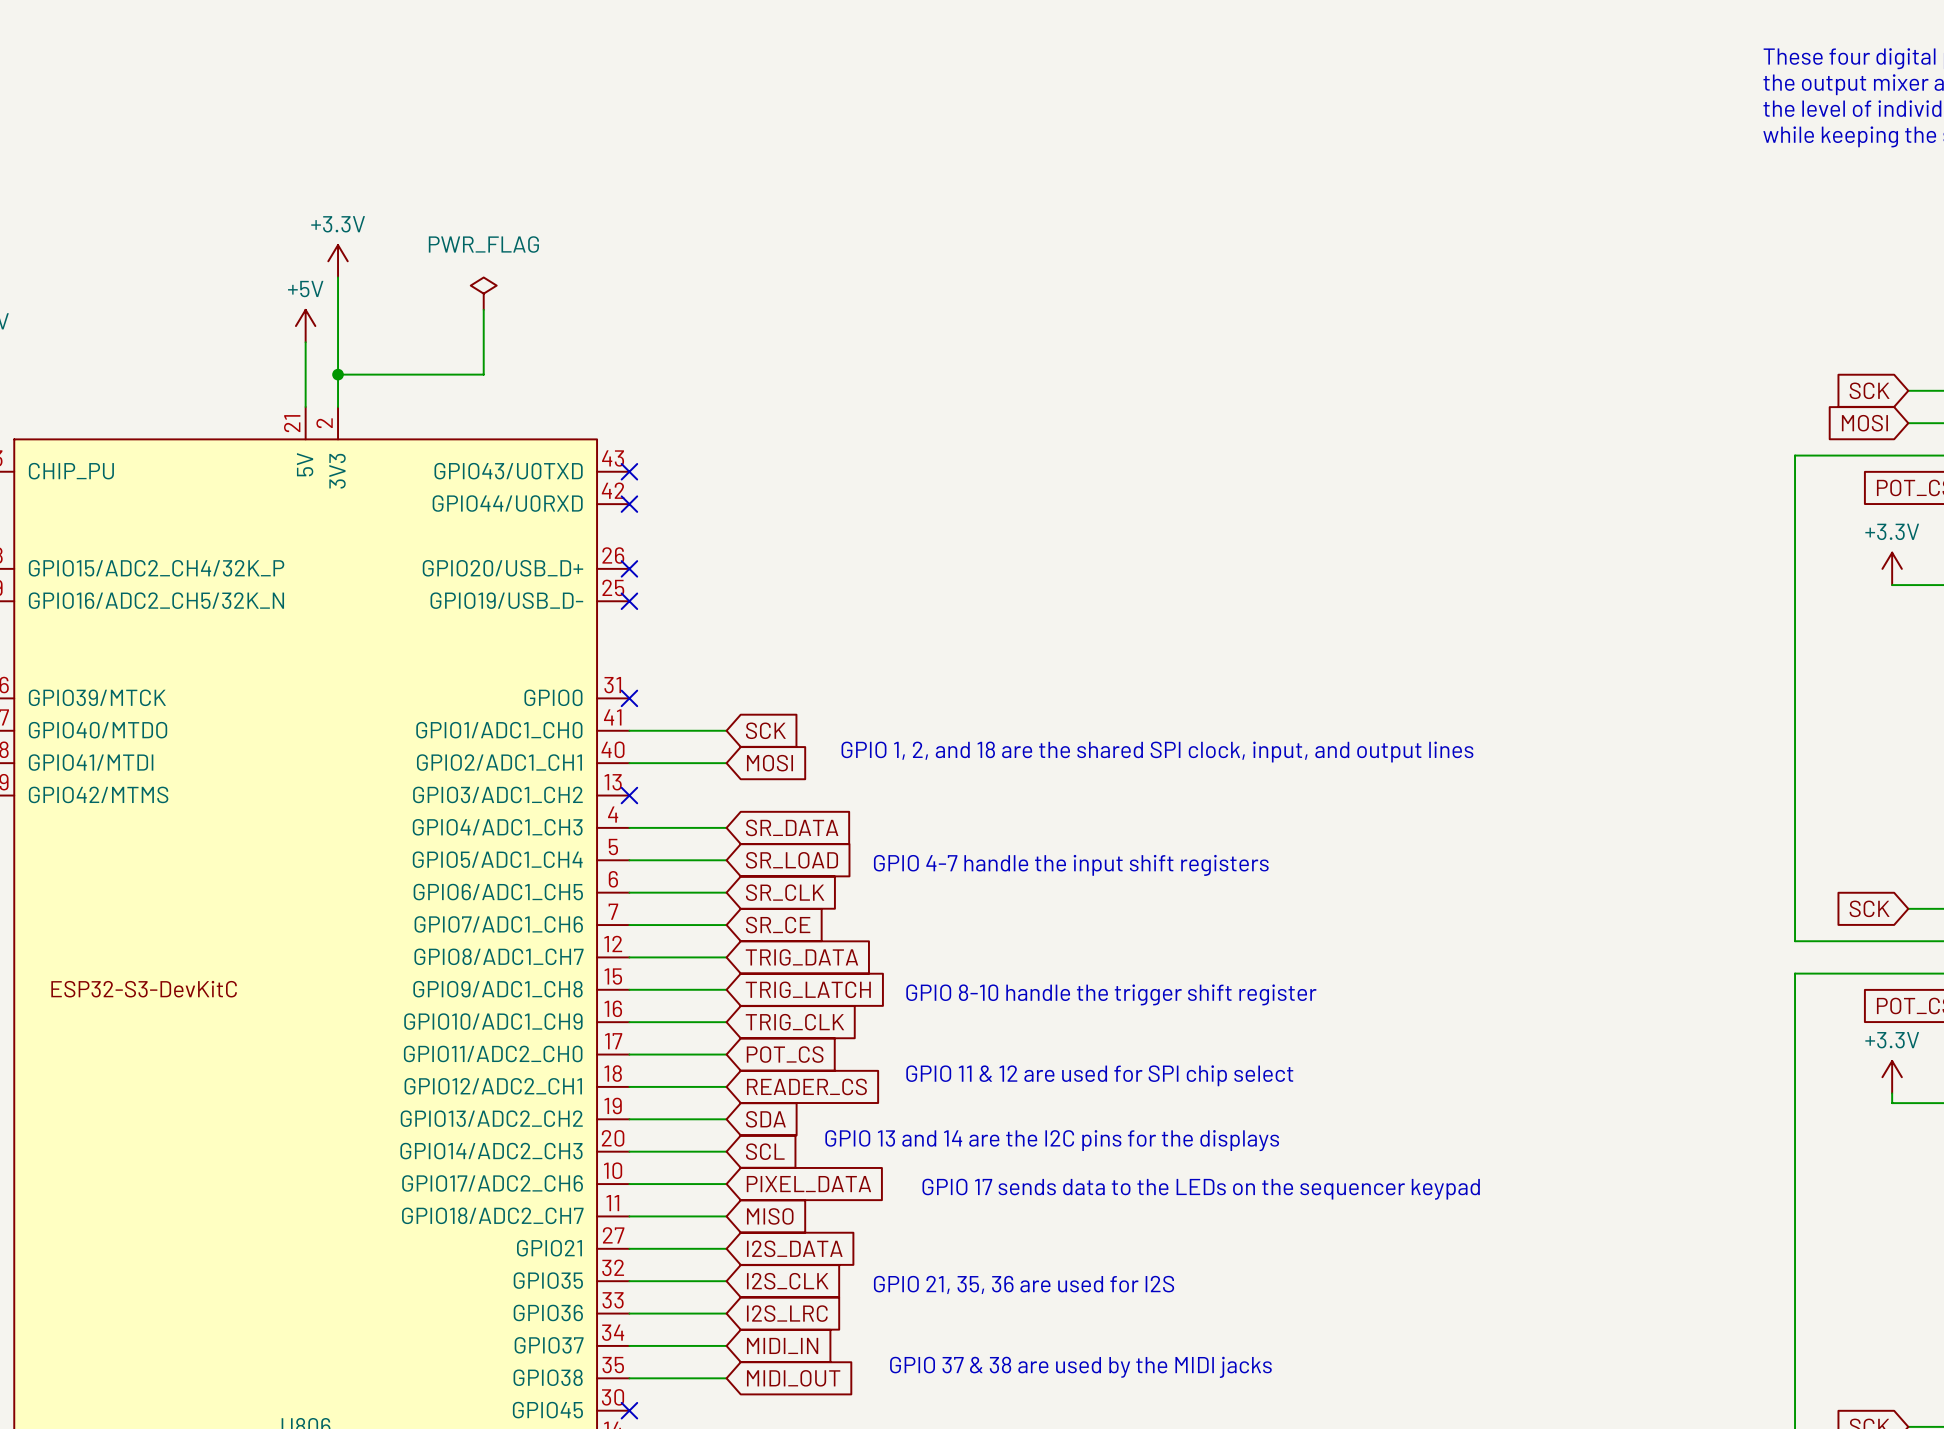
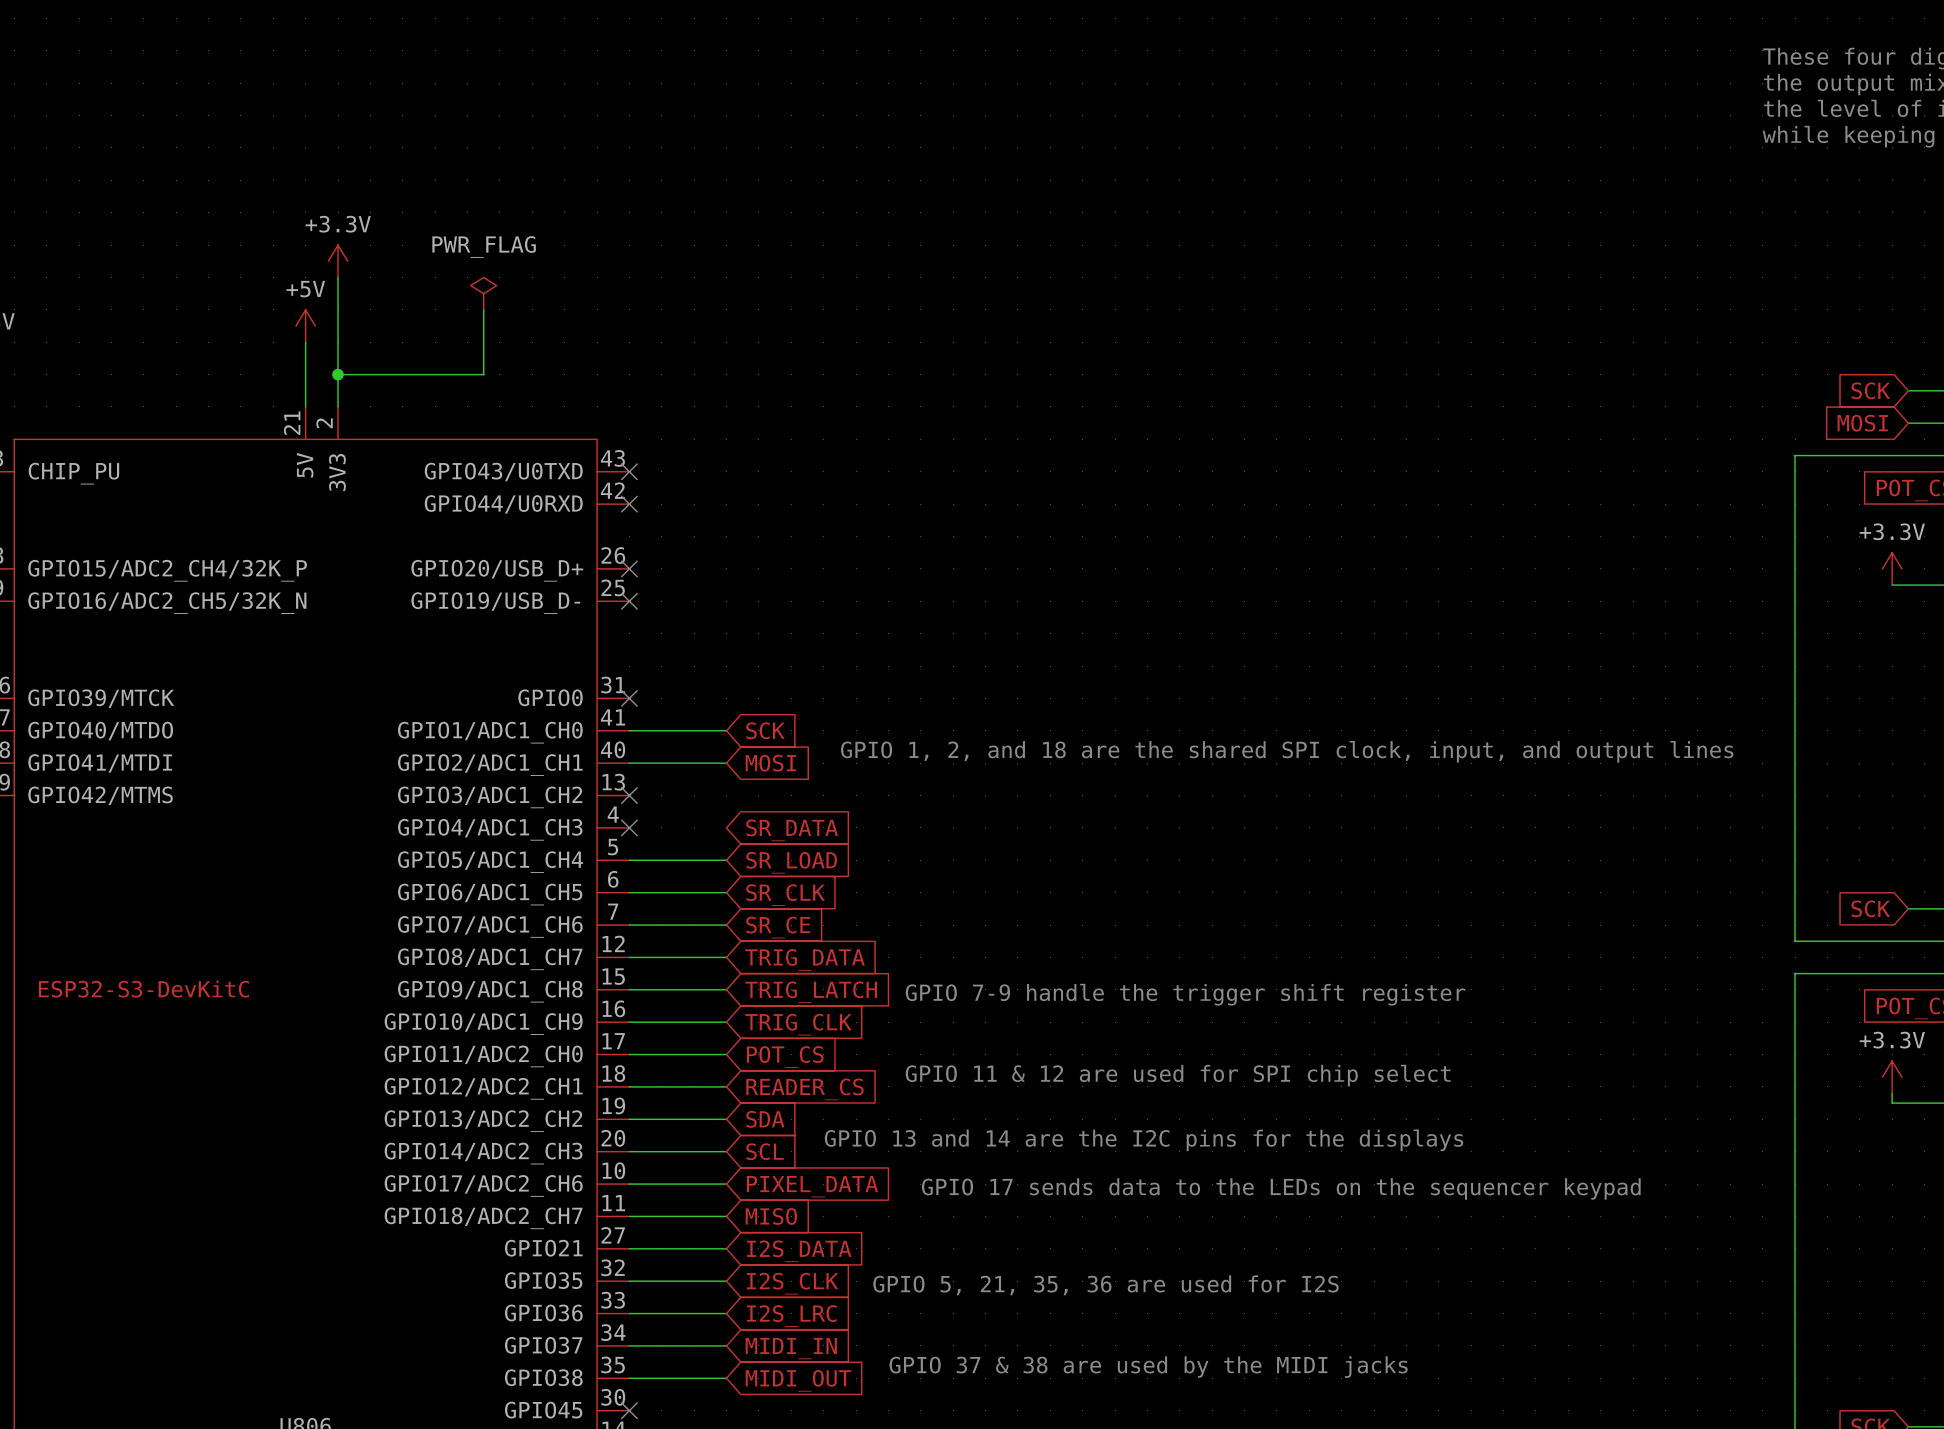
wire: (629, 827) (726, 827) -> none
no-connect mark: none -> (629, 827)
text: GPIO 4-7 handle the input shift registers (1071, 865) -> none
text: GPIO 8-10 handle the trigger shift register (1111, 994) -> GPIO 7-9 handle the trigger shift register (1185, 994)
text: GPIO 21, 35, 36 are used for I2S (1024, 1284) -> GPIO 5, 21, 35, 36 are used for I2S (1106, 1285)

